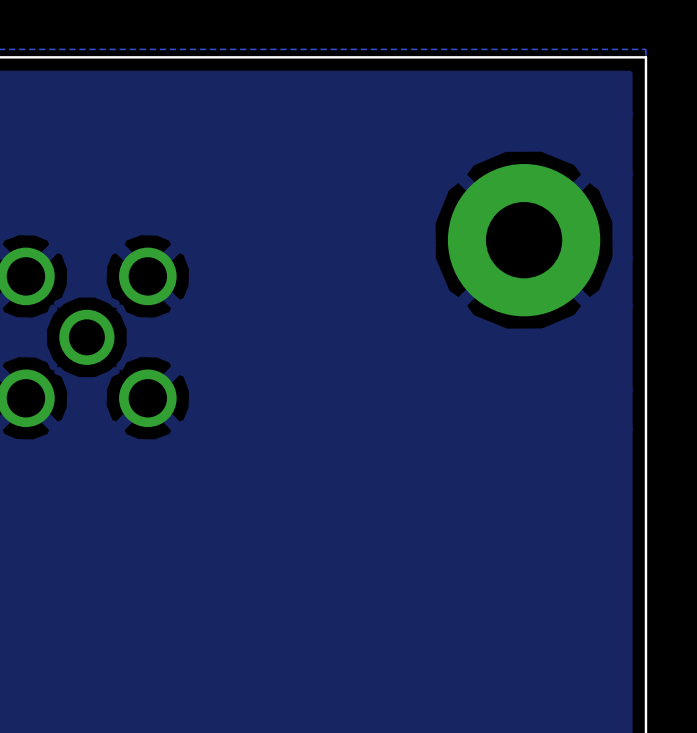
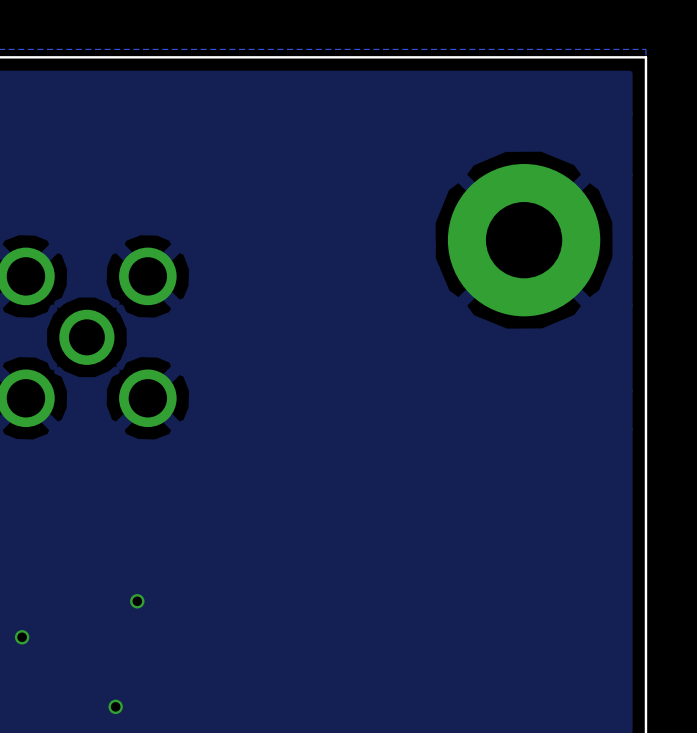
via: none -> (137, 601)
via: none -> (22, 637)
via: none -> (115, 706)

